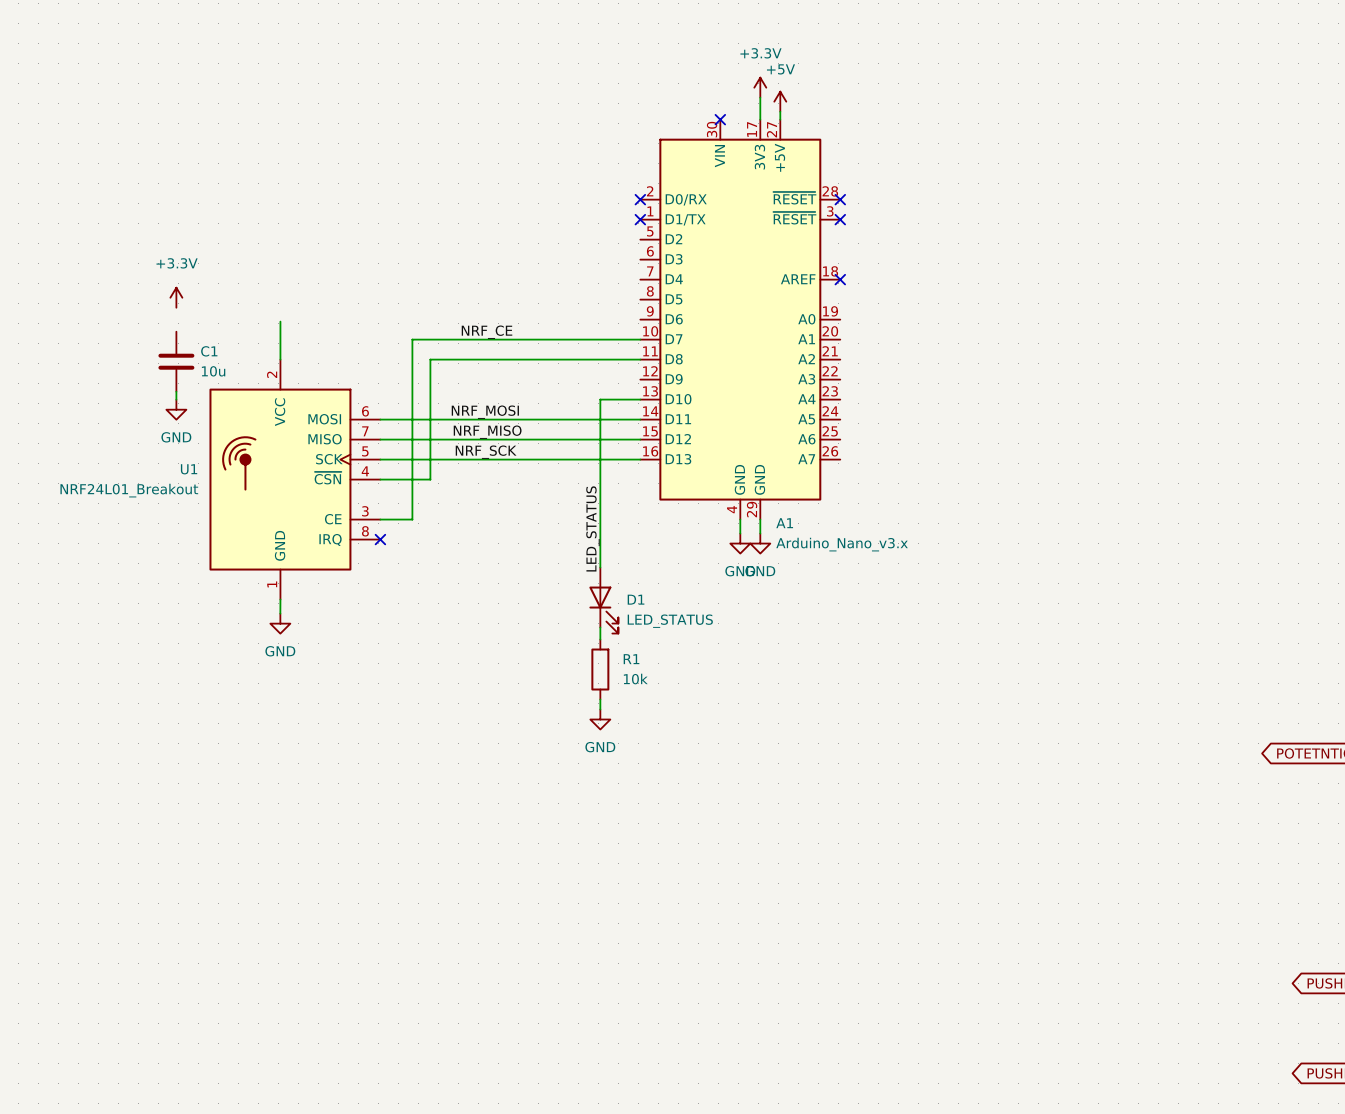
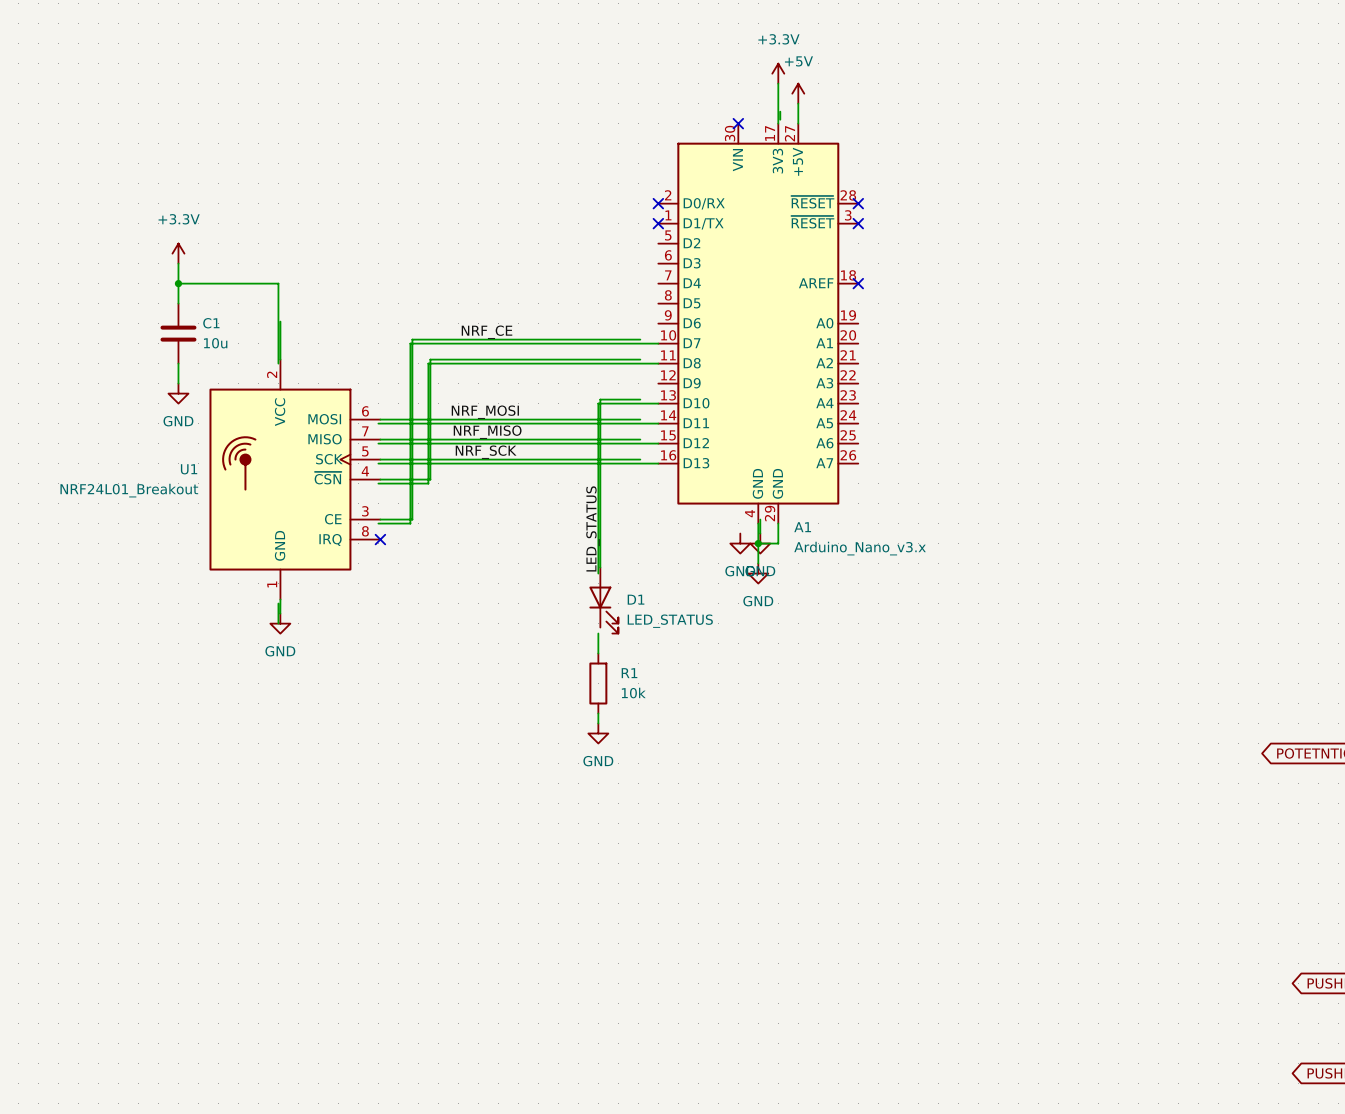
wire: none -> (778, 83) (778, 123)
power symbol position: +3.3V (760, 87) -> +3.3V (778, 73)
wire: (760, 97) (760, 119) -> none
power symbol position: +5V (780, 101) -> +5V (798, 93)
wire: none -> (798, 103) (798, 123)
no-connect mark position: (720, 119) -> (738, 123)
no-connect mark: (640, 199) -> none
no-connect mark: (840, 199) -> none
no-connect mark: none -> (658, 203)
no-connect mark: none -> (858, 203)
no-connect mark: (640, 219) -> none
no-connect mark: (840, 219) -> none
no-connect mark: none -> (658, 223)
no-connect mark: none -> (858, 223)
wire: none -> (178, 263) (178, 303)
no-connect mark position: (840, 279) -> (858, 283)
wire: none -> (178, 283) (278, 283) (278, 363)
junction: none -> (178, 283)
power symbol position: +3.3V (176, 297) -> +3.3V (178, 253)
A1 position: (740, 319) -> (758, 323)
wire: none -> (658, 343) (410, 343) (410, 523) (378, 523)
C1 position: (176, 361) -> (178, 333)
wire: none -> (178, 363) (178, 383)
wire: none -> (658, 363) (428, 363) (428, 483) (378, 483)
wire: (176, 391) (176, 399) -> none
wire: none -> (658, 403) (598, 403) (598, 573)
power symbol position: GND (176, 409) -> GND (178, 393)
wire: none -> (378, 423) (658, 423)
wire: none -> (378, 443) (658, 443)
wire: none -> (378, 463) (658, 463)
wire: (740, 519) (740, 533) -> none
wire: none -> (758, 523) (758, 563)
wire: none -> (778, 523) (778, 543) (758, 543)
junction: none -> (758, 543)
power symbol: none -> GND (758, 573)
wire: none -> (278, 603) (278, 623)
wire: (600, 627) (600, 639) -> none
wire: none -> (598, 633) (598, 653)
R1 position: (600, 669) -> (598, 683)
wire: (600, 699) (600, 709) -> (598, 713) (598, 723)
power symbol position: GND (600, 719) -> GND (598, 733)

